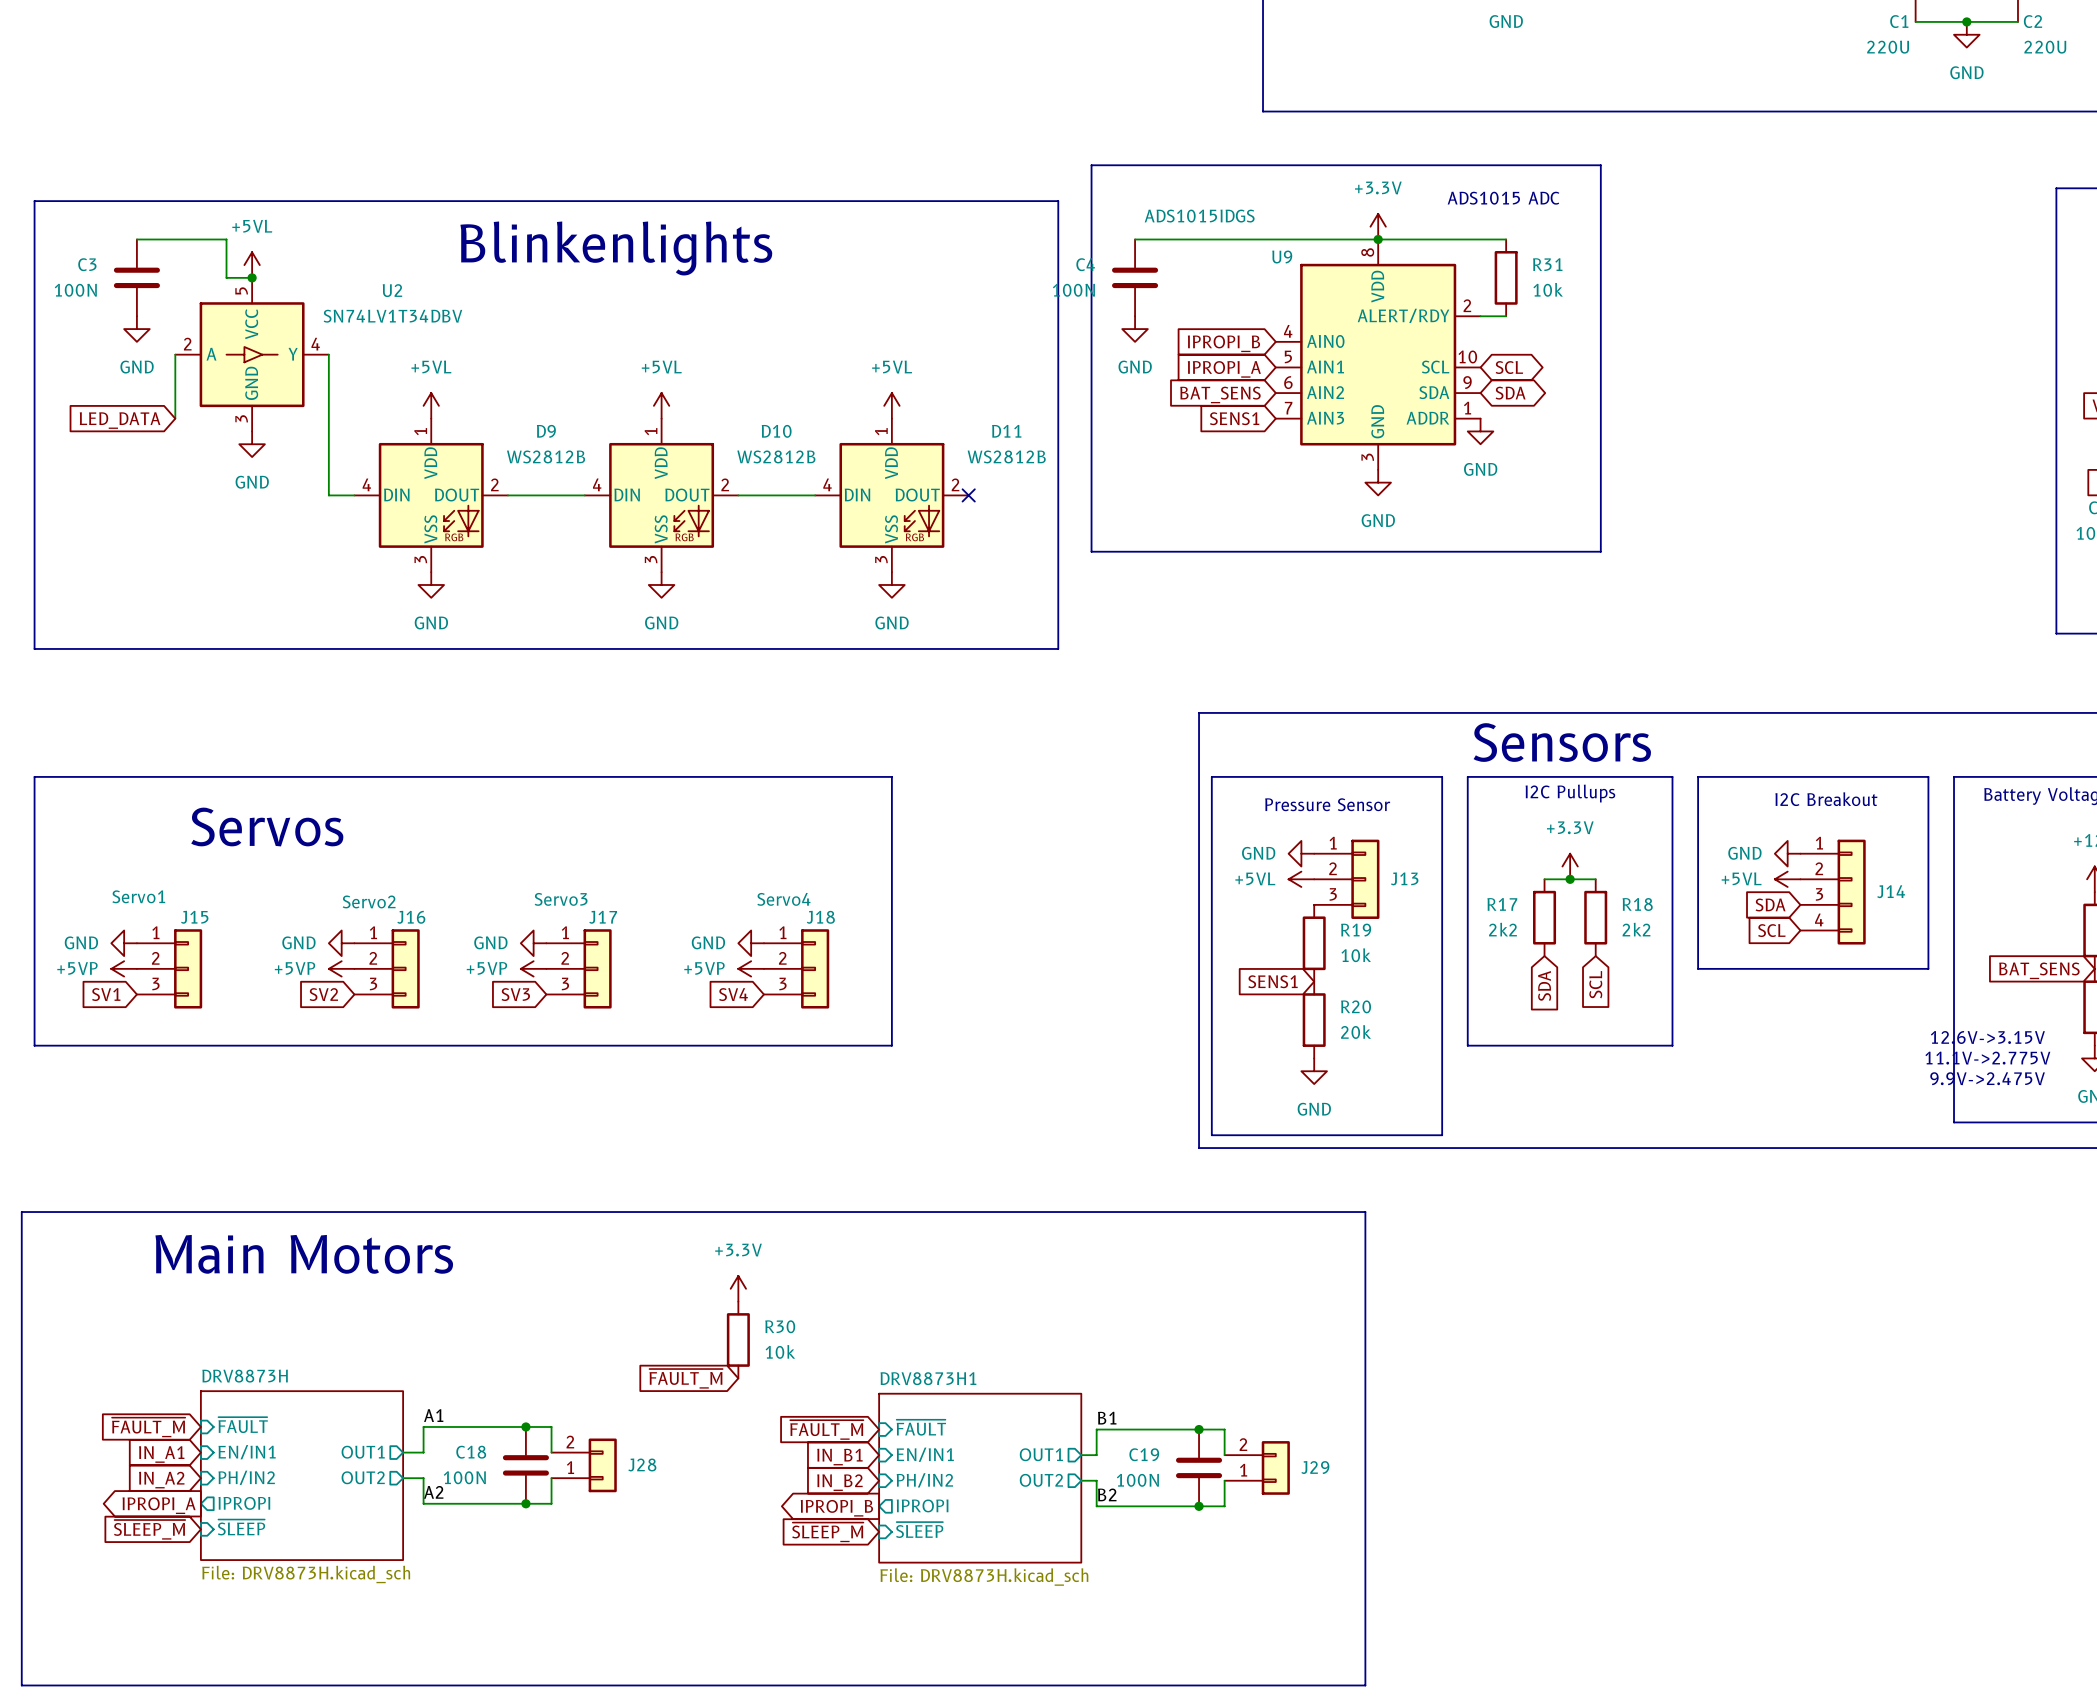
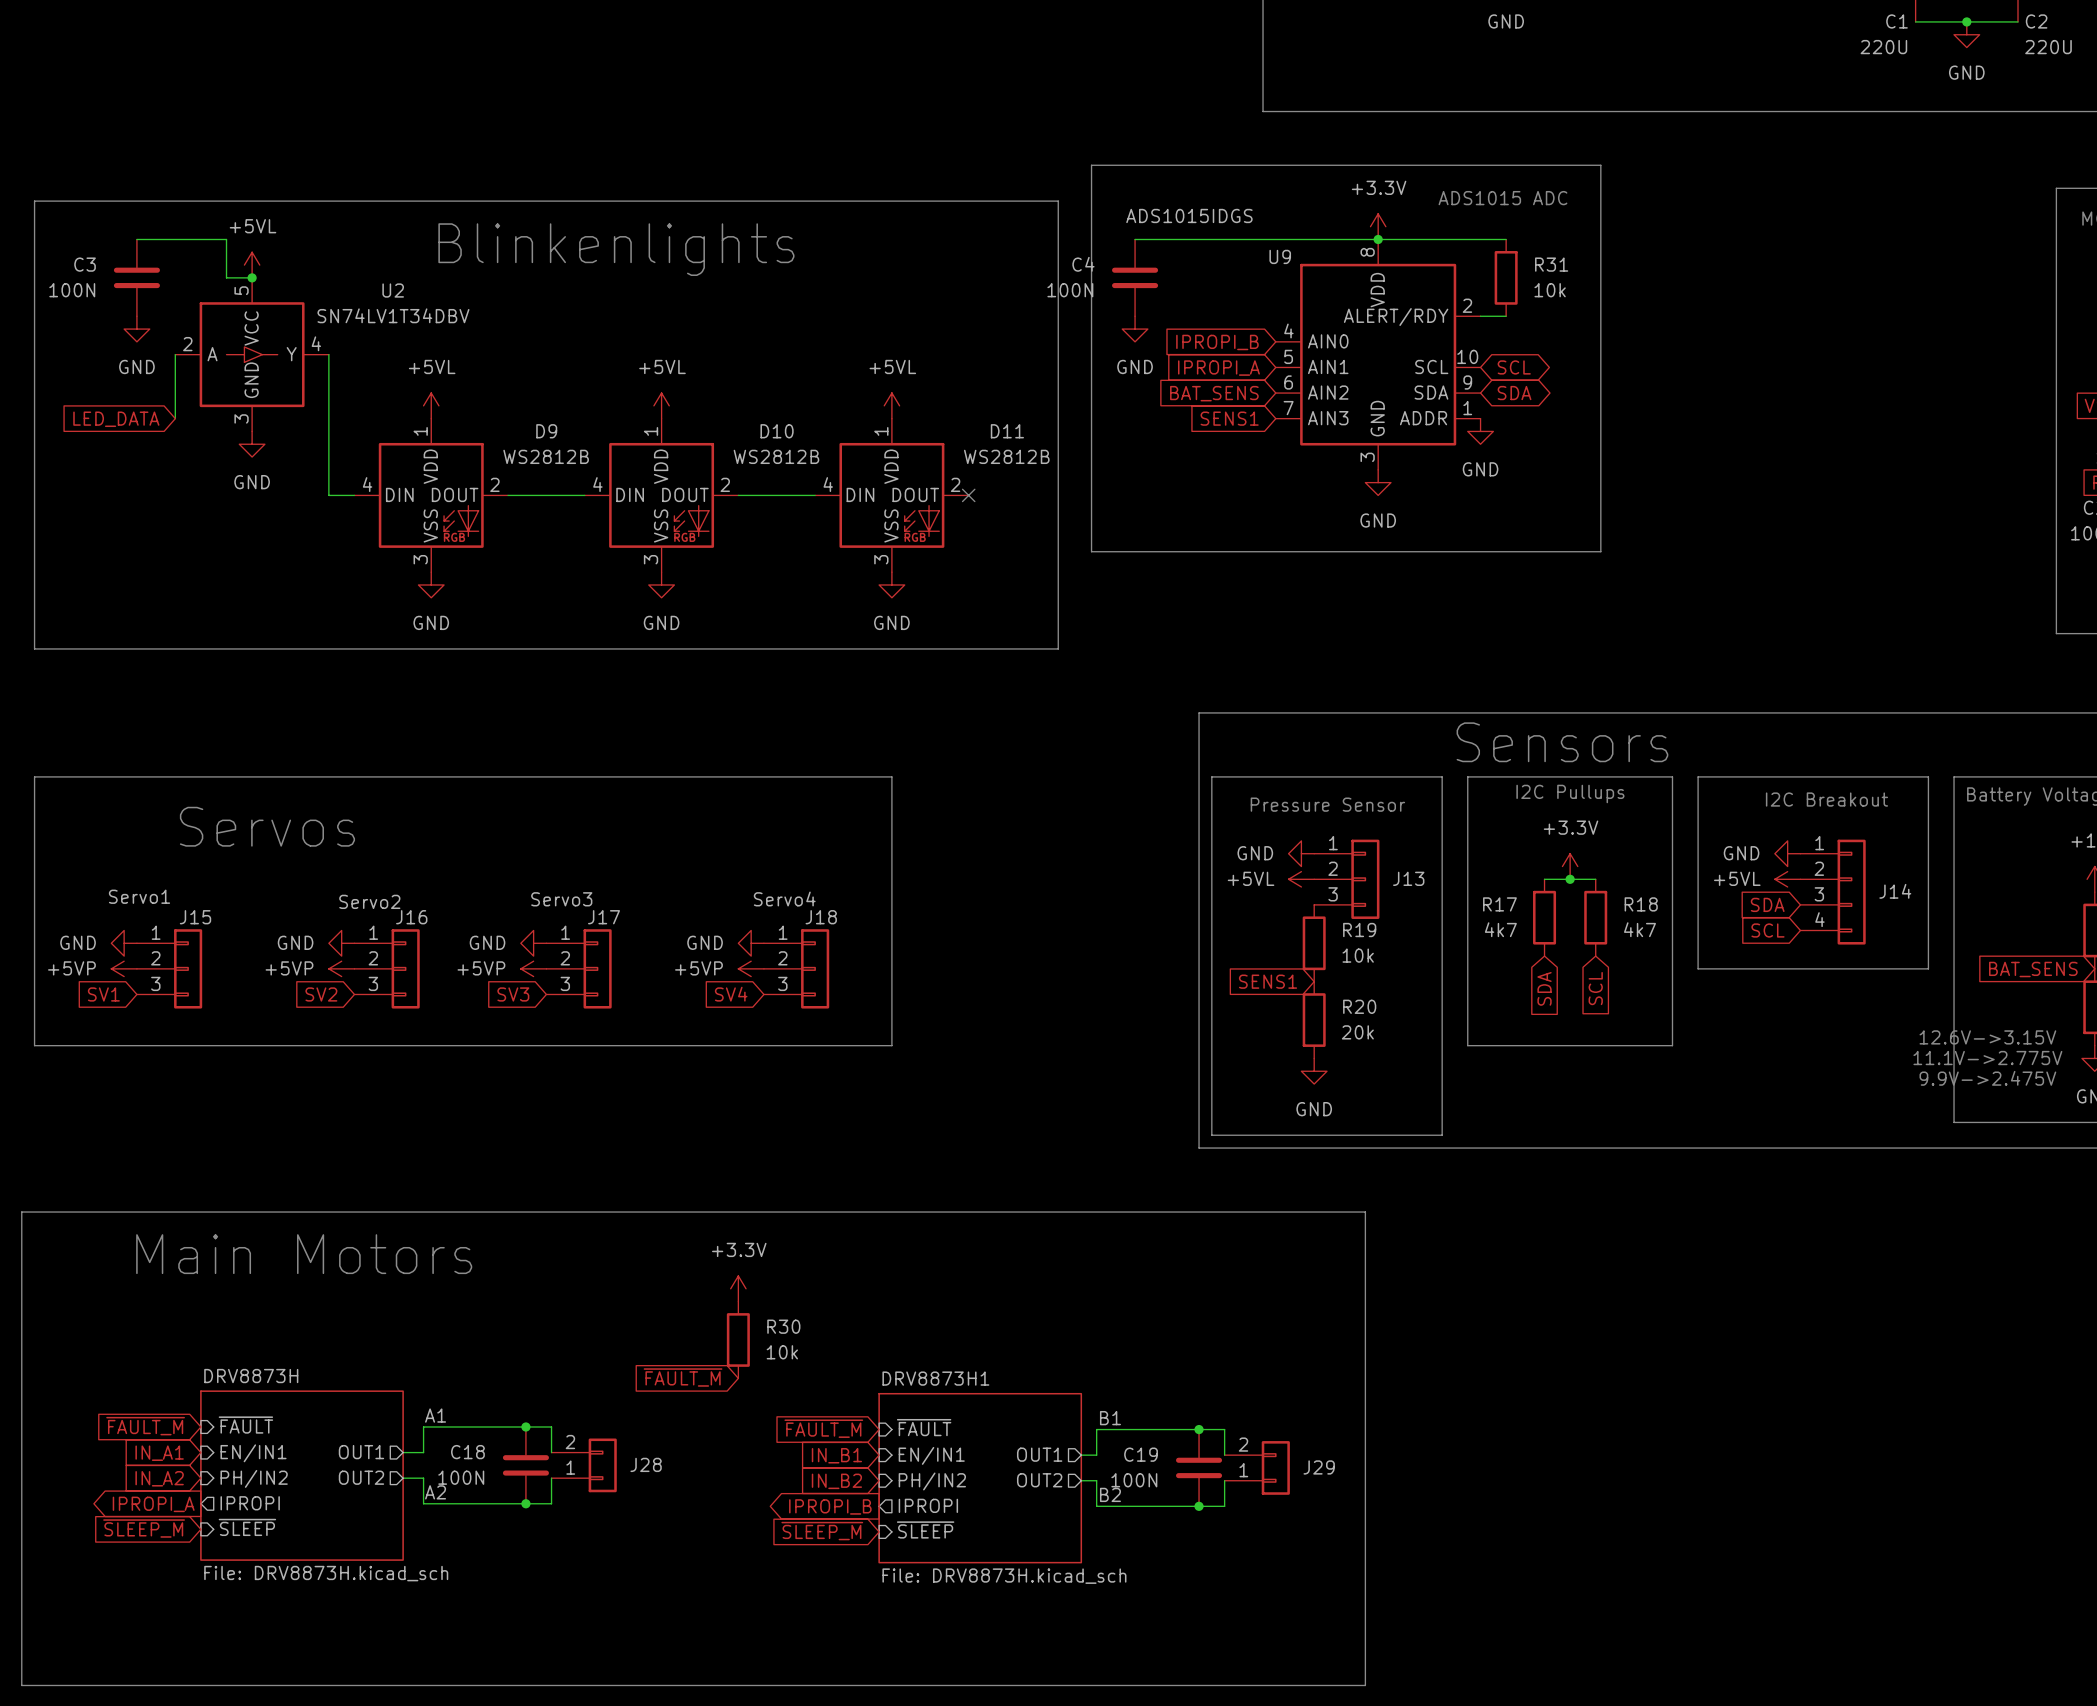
R17 value: 2k2 (1502, 929) -> 4k7 (1500, 929)
R18 value: 2k2 (1636, 929) -> 4k7 (1639, 929)

